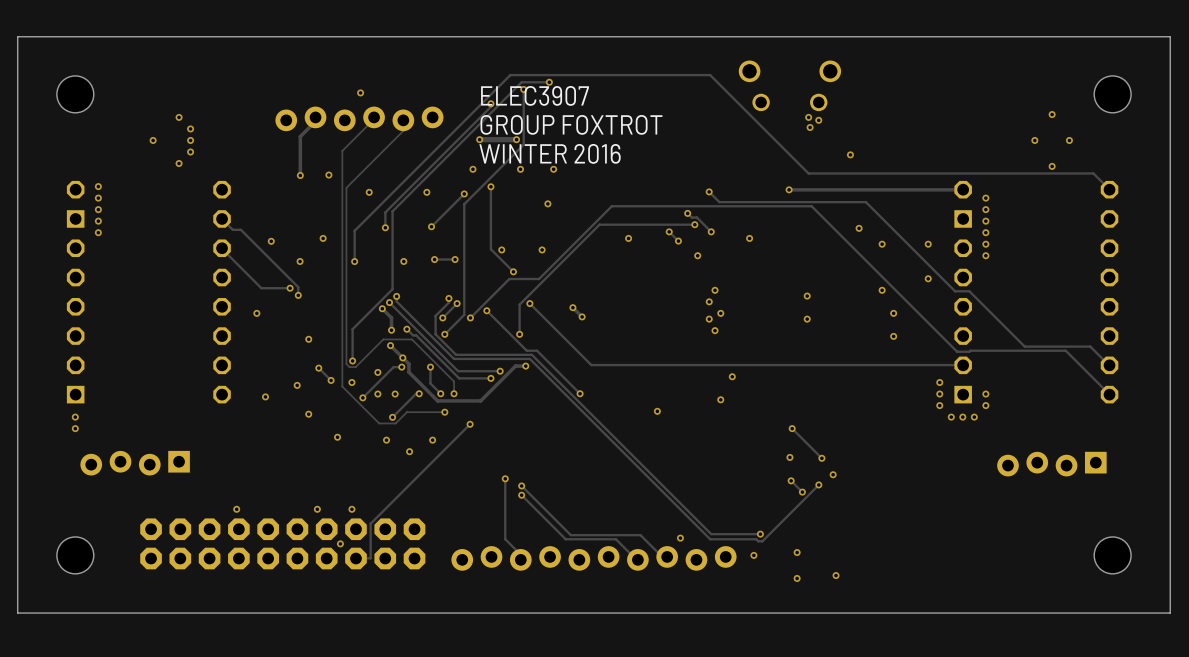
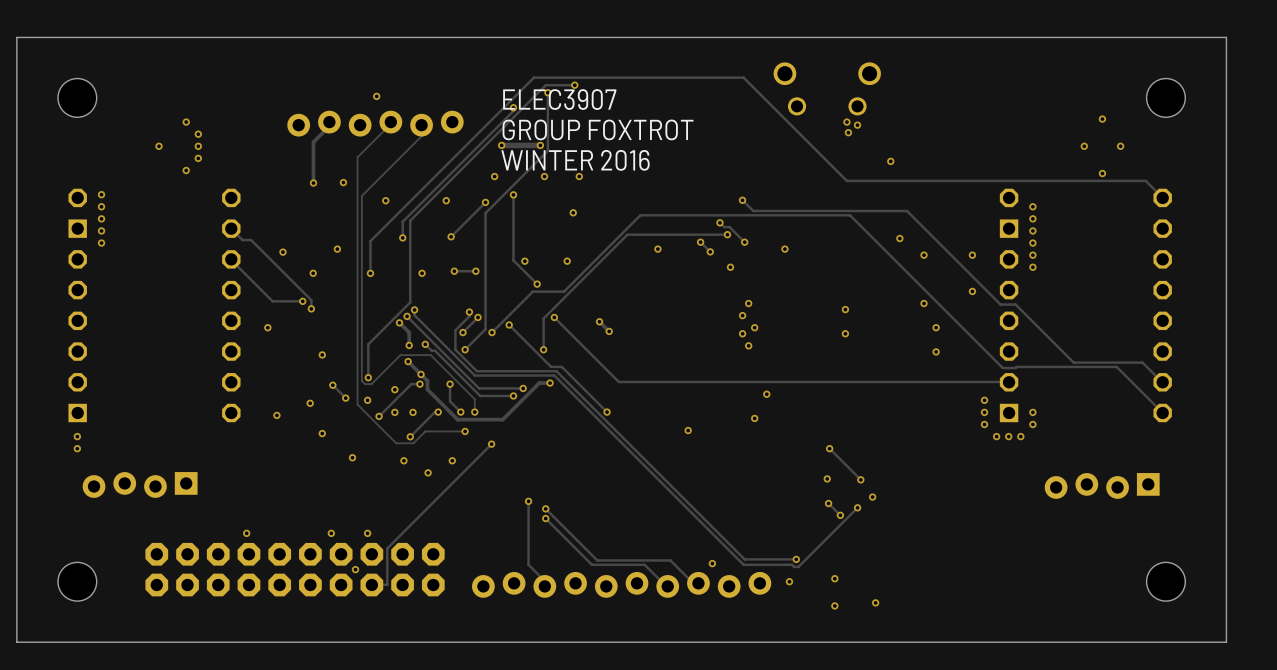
via: (789, 189) -> none
track: (963, 189) (789, 189) -> none

